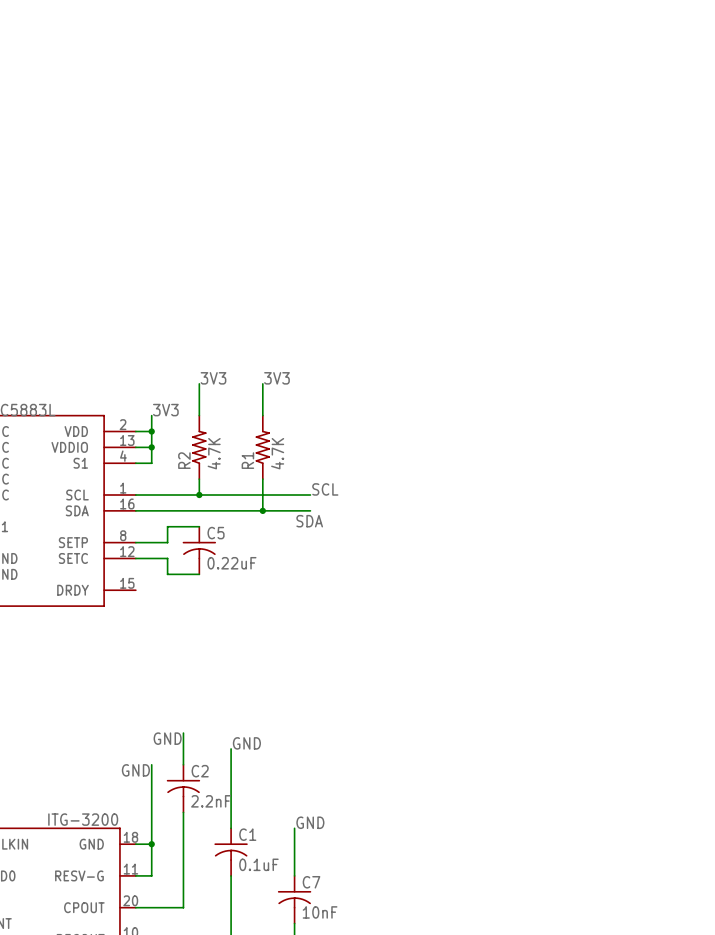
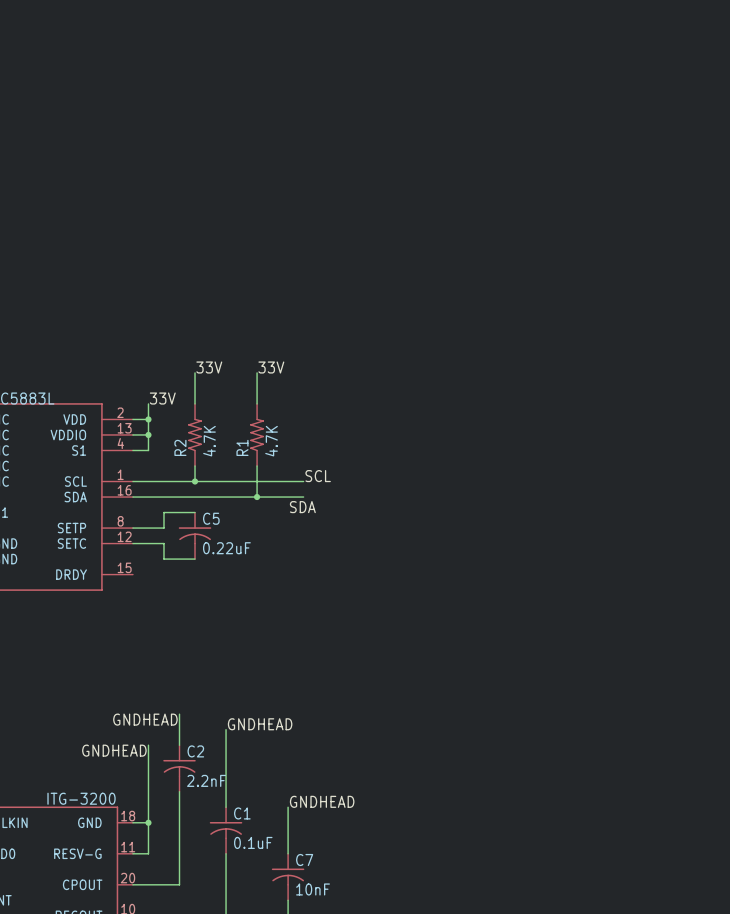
label: 3V3 (213, 378) -> 33V (209, 367)
label: 3V3 (276, 378) -> 33V (271, 367)
label: 3V3 (165, 410) -> 33V (162, 398)
label: GND (167, 738) -> GNDHEAD (145, 719)
label: GND (246, 743) -> GNDHEAD (260, 724)
label: GND (135, 770) -> GNDHEAD (114, 750)
label: GND (310, 822) -> GNDHEAD (322, 801)

